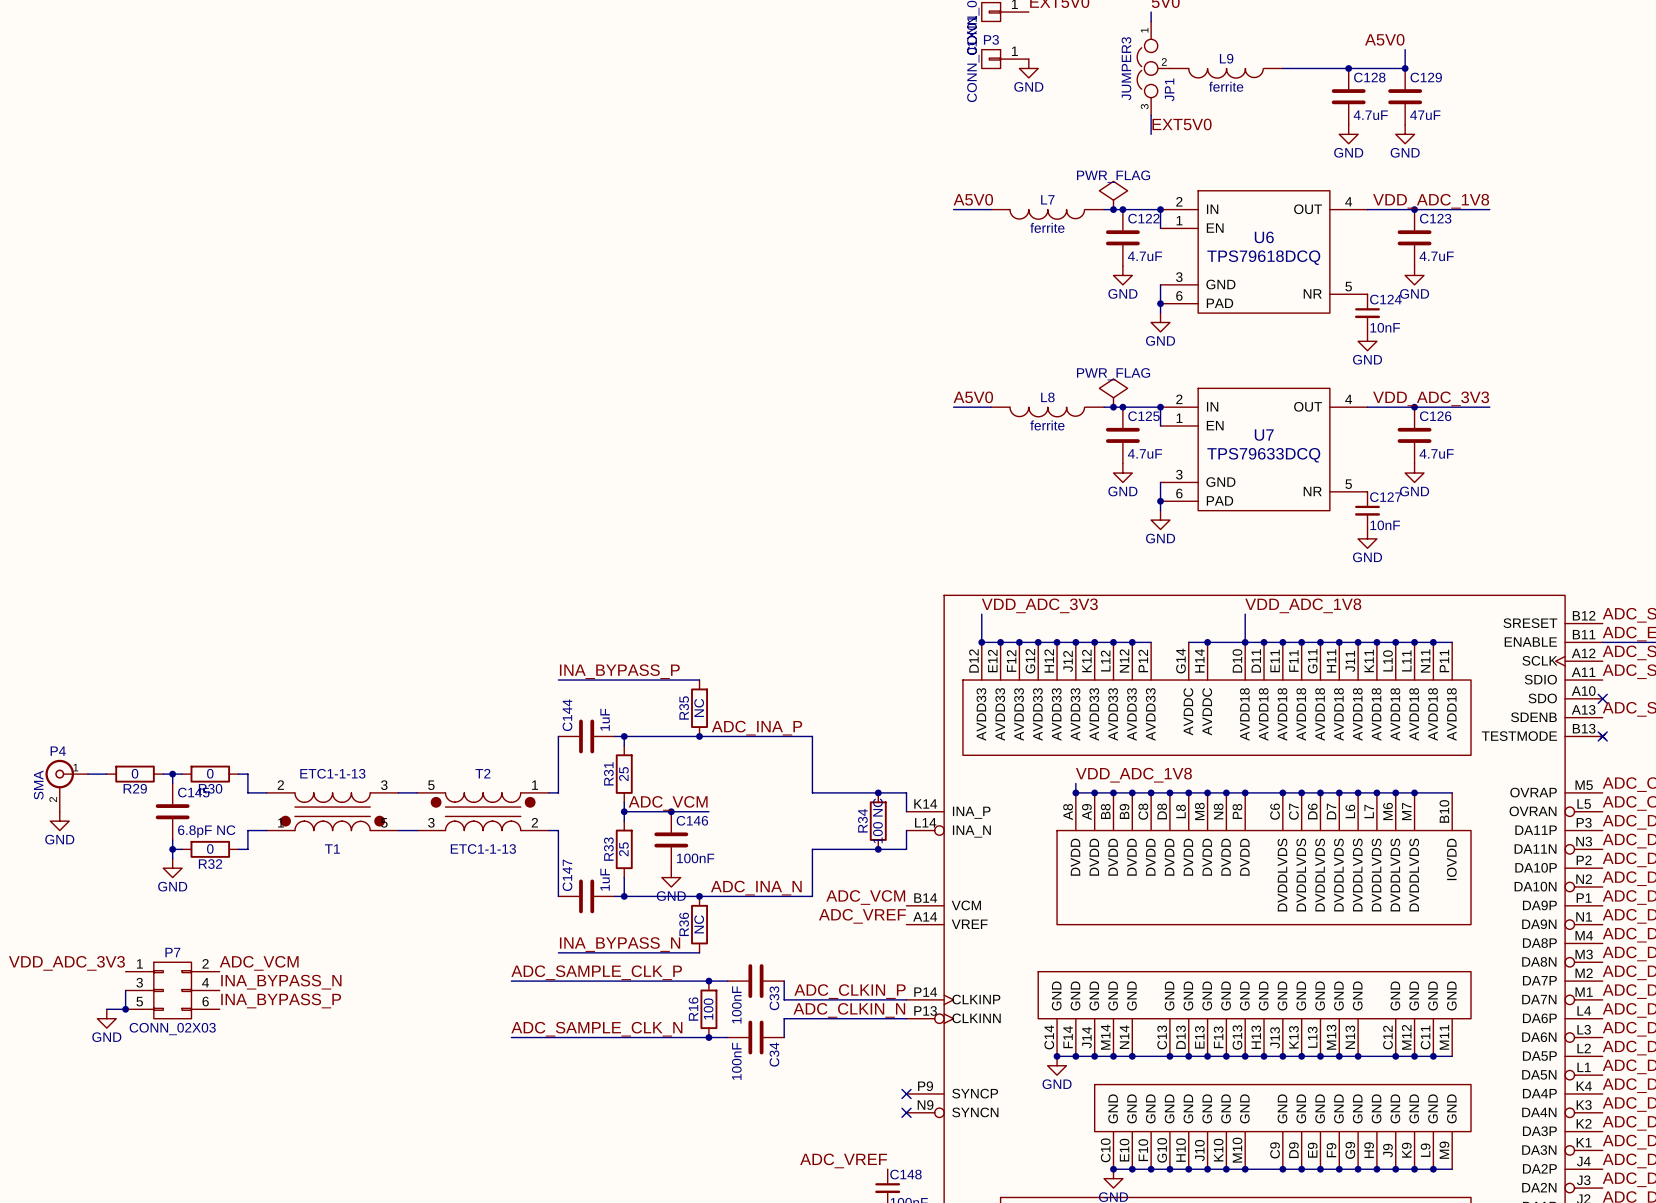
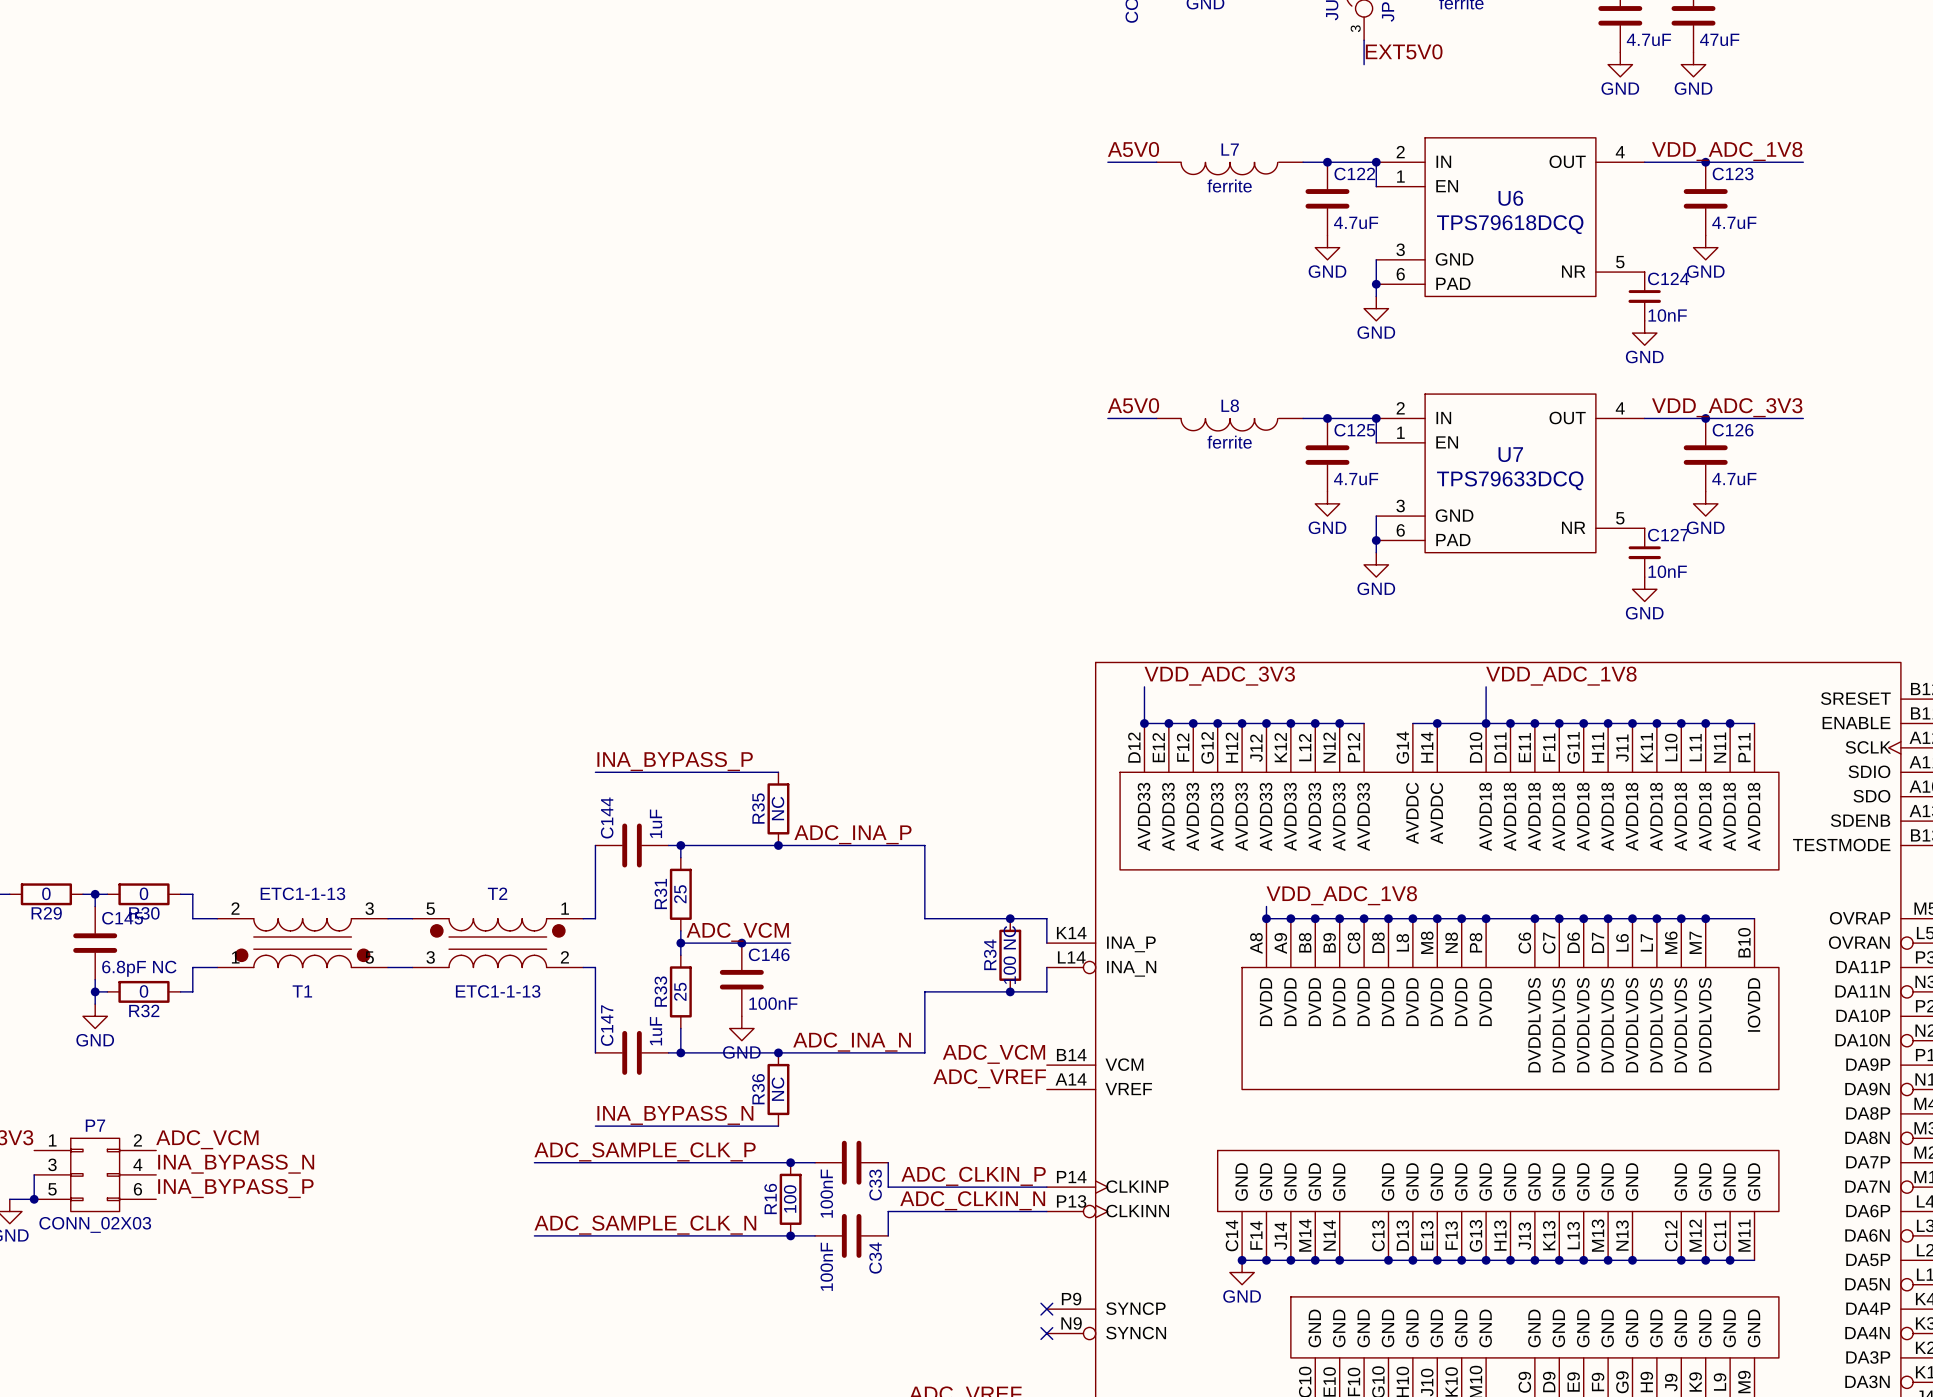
power symbol: PWR_FLAG (1113, 195) -> none
junction: (1113, 209) -> none
power symbol: PWR_FLAG (1113, 393) -> none
junction: (1113, 407) -> none

